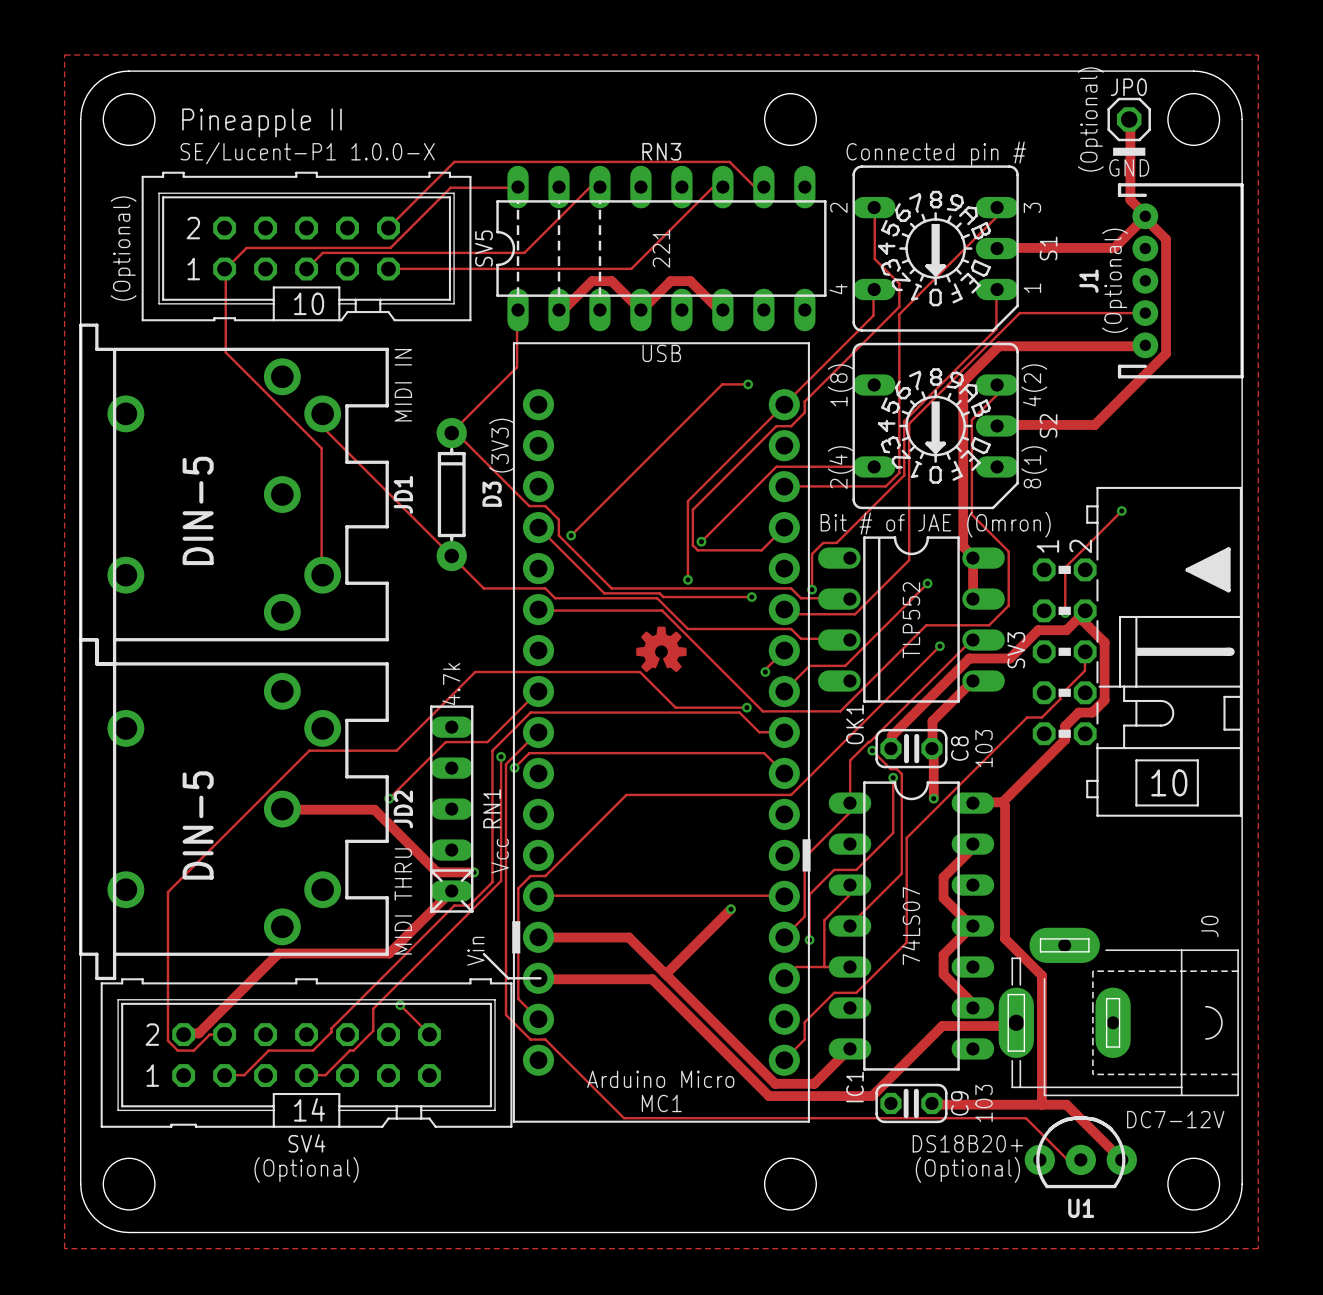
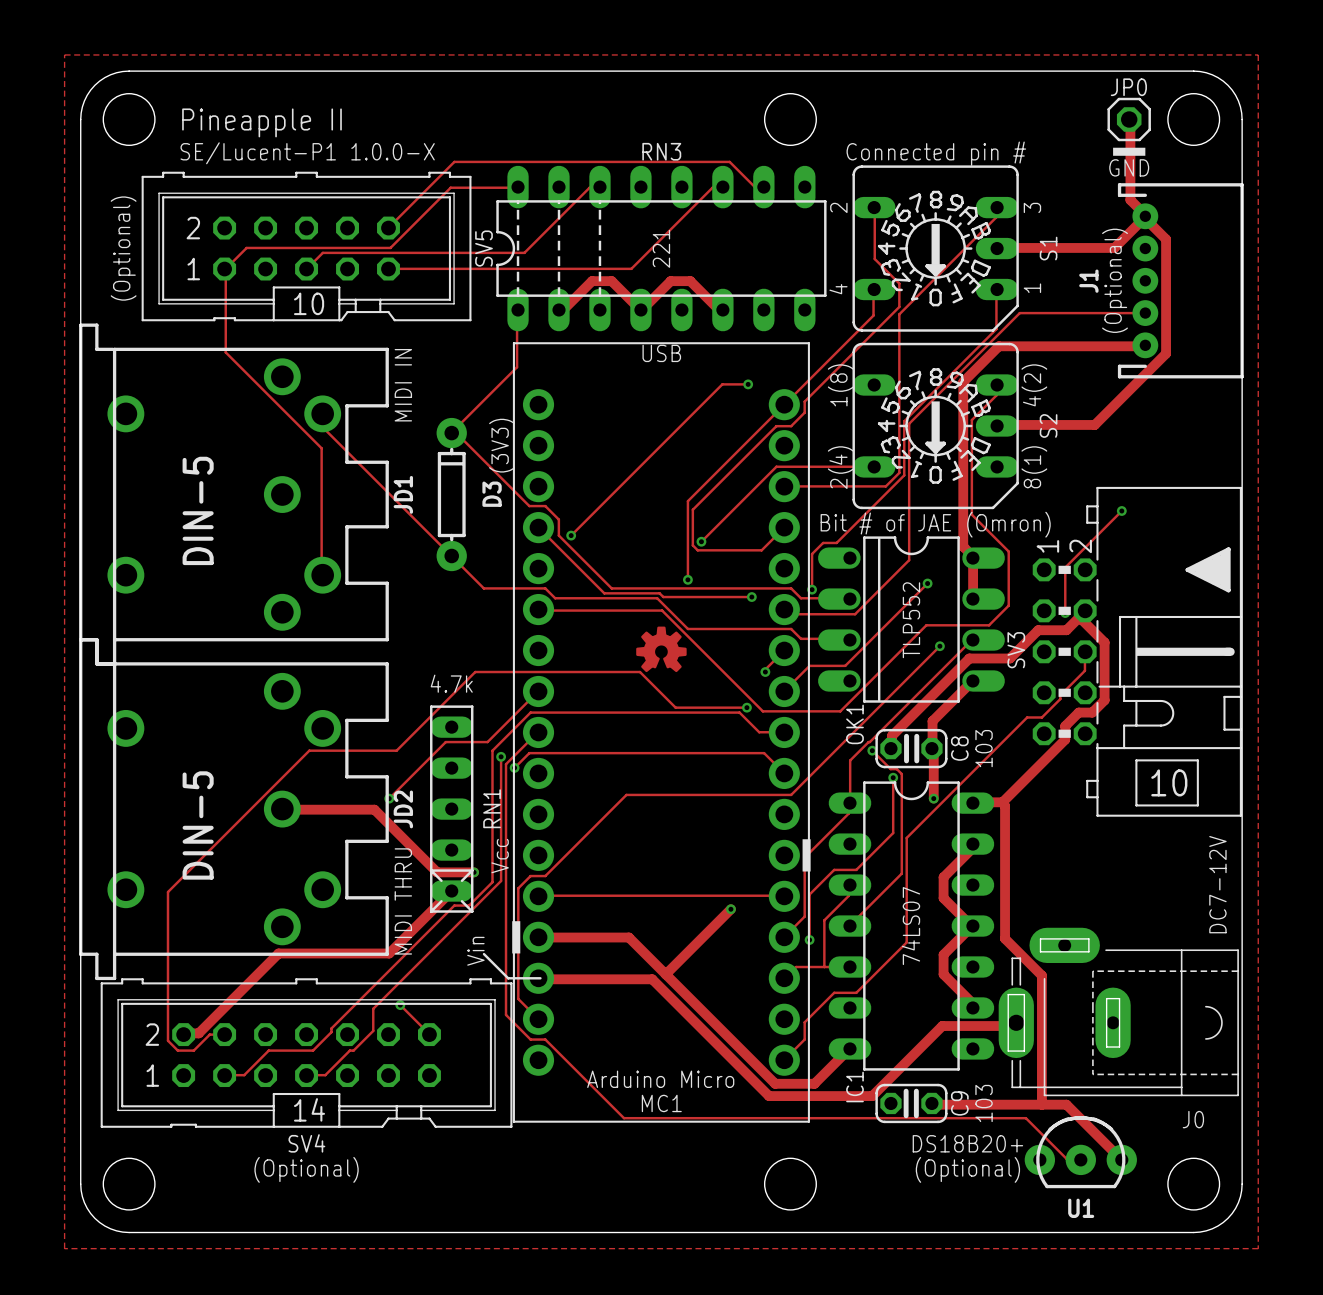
text: (Optional) (1090, 119) -> none
text rotation: 0° (451, 684) -> 90° clockwise (451, 683)
J0 name rotation: 0° (1209, 926) -> 90° clockwise (1193, 1119)
J0 name position: J0 (1209, 926) -> J0 (1193, 1119)
text rotation: 0° (1175, 1119) -> 90° counterclockwise (1217, 884)
text position: DC7-12V (1175, 1119) -> DC7-12V (1217, 884)

